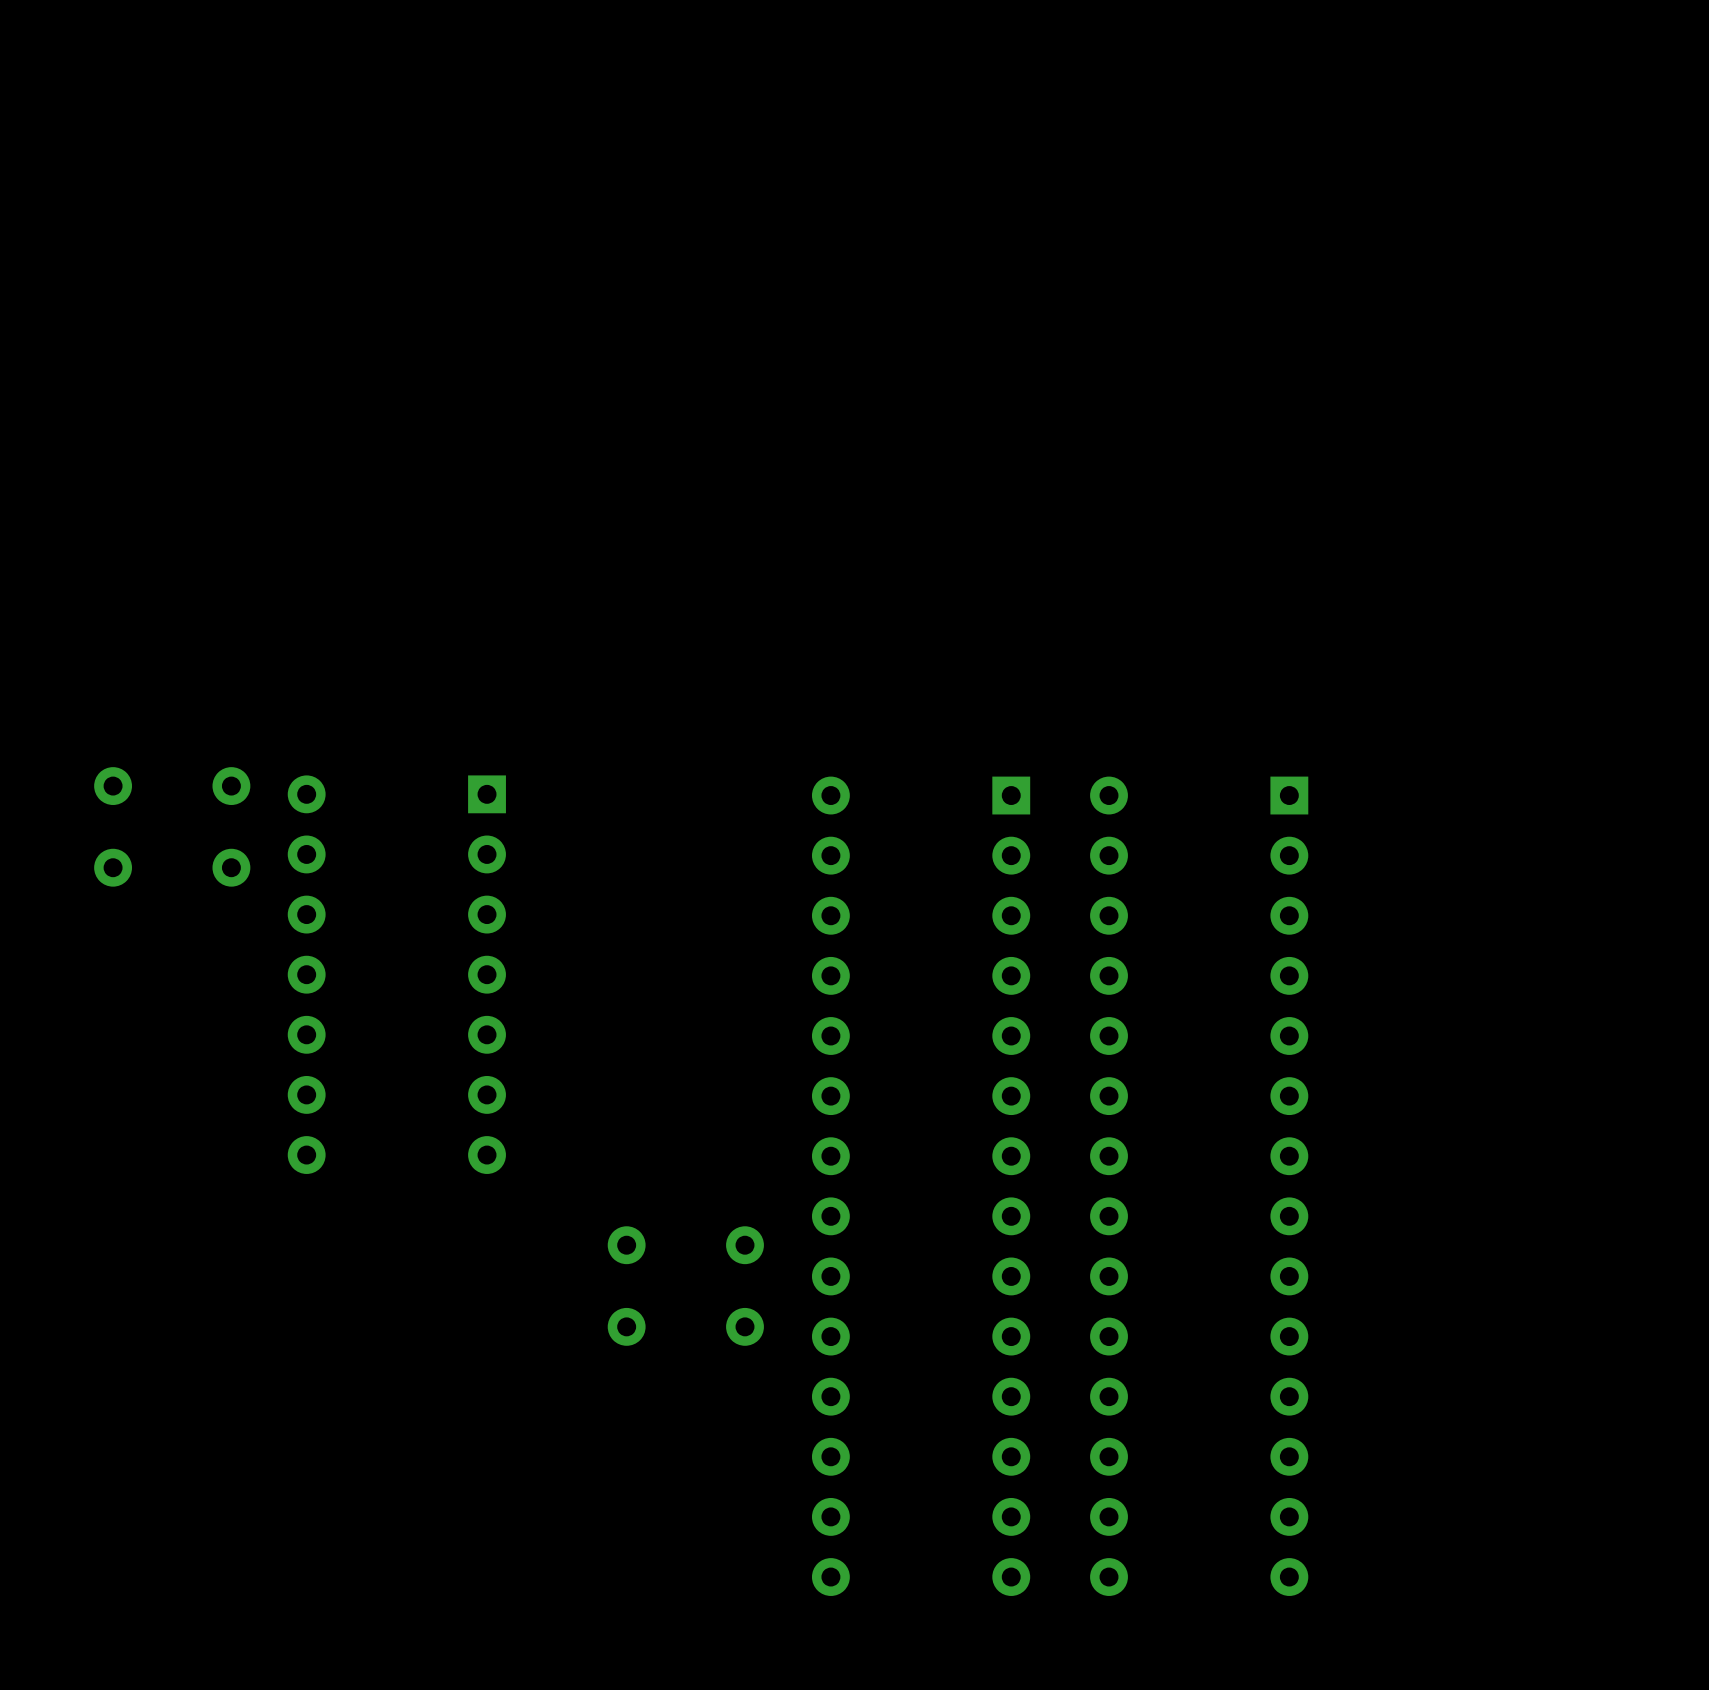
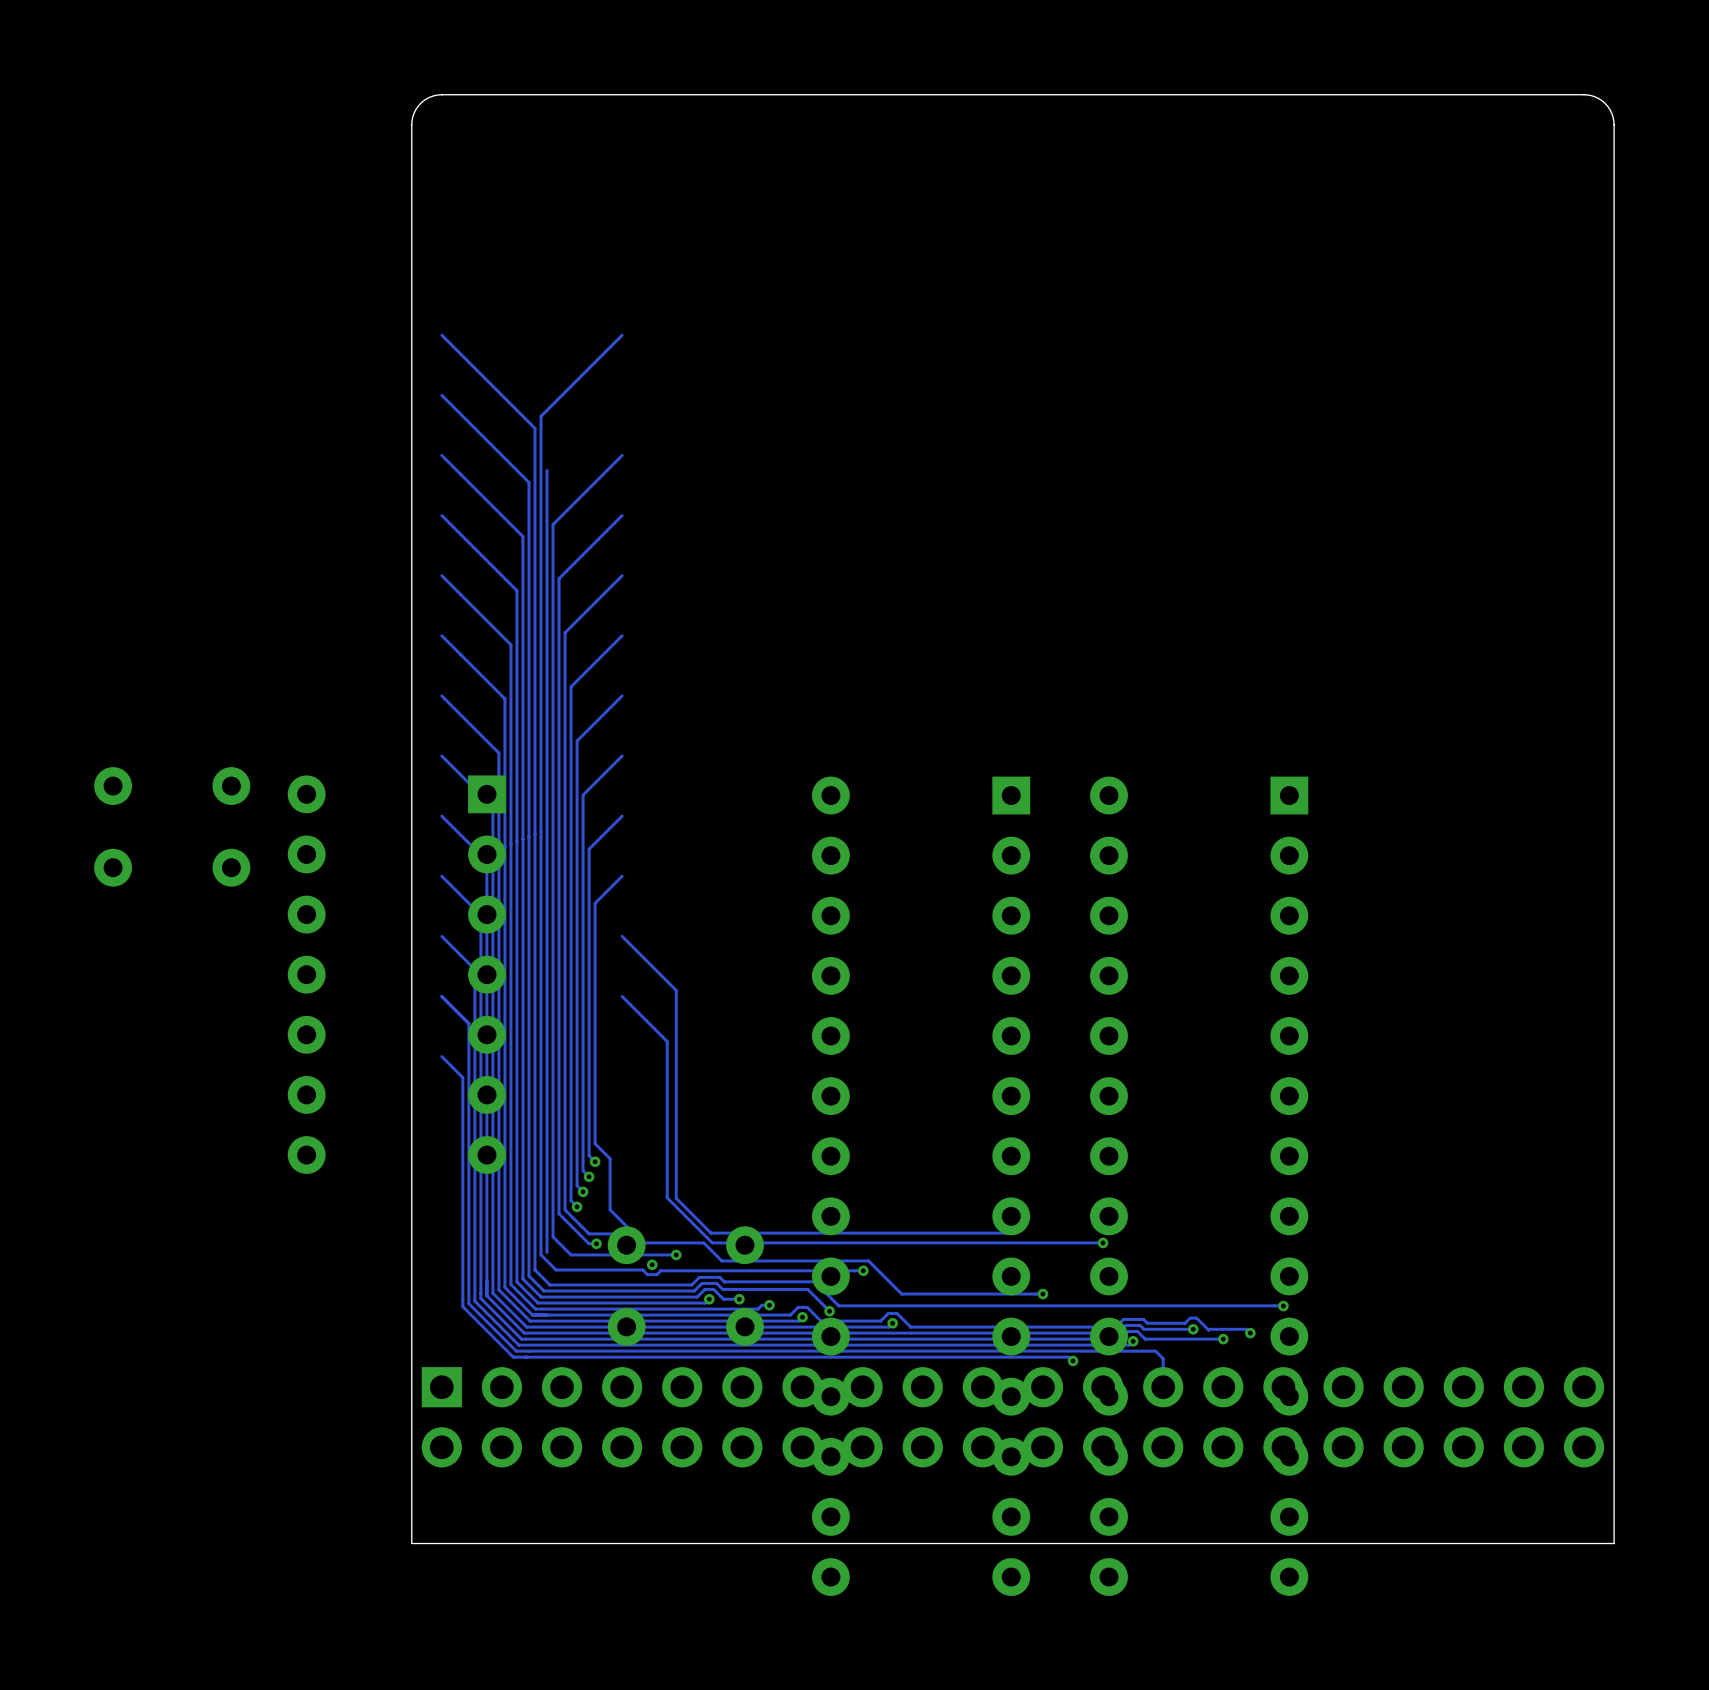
board edge: none -> (1584, 94) (441, 94) (430, 97) (417, 106) (412, 117) (411, 124) (411, 1543) (1614, 1543) (1614, 124) (1611, 113) (1605, 103) (1595, 97) (1584, 94)
track: none -> (441, 335) (534, 428) (535, 1269) (550, 1285) (691, 1285) (699, 1277) (719, 1277) (724, 1282)
track: none -> (622, 335) (541, 416) (541, 1254) (556, 1269) (642, 1269) (647, 1274) (656, 1274) (660, 1270) (863, 1270)
track: none -> (441, 395) (528, 482) (528, 1276) (544, 1291) (694, 1291) (700, 1285)
track: none -> (441, 455) (522, 536) (522, 1279) (541, 1297) (697, 1297) (704, 1289) (713, 1289) (723, 1299) (739, 1299)
track: none -> (622, 455) (553, 524) (553, 1236) (571, 1254) (676, 1254)
track: none -> (547, 470) (547, 1252)
track: none -> (441, 515) (516, 590) (516, 841)
track: none -> (622, 515) (559, 578) (559, 1213) (588, 1243) (596, 1243)
track: none -> (441, 575) (510, 644) (510, 1284) (535, 1309) (758, 1309) (761, 1305) (769, 1305)
track: none -> (622, 575) (565, 632) (565, 1209) (589, 1233) (619, 1233)
track: none -> (441, 635) (504, 698) (504, 1287) (532, 1315) (790, 1315) (798, 1307) (807, 1307) (820, 1321) (880, 1321) (888, 1313) (897, 1313) (910, 1327) (1115, 1327) (1123, 1319) (1143, 1319) (1147, 1323) (1185, 1323) (1190, 1318) (1196, 1318) (1208, 1330) (1246, 1329) (1250, 1333)
track: none -> (622, 635) (571, 686) (571, 1200) (577, 1206)
track: none -> (441, 695) (498, 752) (498, 1289) (530, 1321) (798, 1321) (802, 1317)
track: none -> (622, 695) (577, 740) (577, 1185) (583, 1191)
track: none -> (441, 756) (492, 807) (492, 1293) (526, 1327) (888, 1327) (892, 1323)
track: none -> (622, 756) (583, 795) (583, 1170) (589, 1176)
track: none -> (441, 816) (486, 861) (486, 1296)
track: none -> (622, 816) (589, 849) (589, 1155) (595, 1161)
track: none -> (516, 841) (516, 1282) (538, 1303) (705, 1303) (709, 1299)
track: none -> (441, 876) (480, 915) (480, 1298) (521, 1339) (1121, 1339)
track: none -> (622, 876) (595, 903) (595, 1143) (610, 1158) (610, 1209) (643, 1242) (703, 1242) (721, 1260) (868, 1260) (901, 1294) (1042, 1294)
track: none -> (441, 936) (474, 969) (474, 1301) (518, 1345) (1129, 1345) (1133, 1341)
track: none -> (622, 936) (676, 990) (676, 1198) (711, 1233) (1012, 1233)
track: none -> (441, 996) (468, 1023) (468, 1303) (516, 1351) (1155, 1351) (1163, 1358) (1163, 1387)
track: none -> (622, 996) (667, 1041) (667, 1197) (712, 1242) (1103, 1242)
track: none -> (441, 1056) (462, 1077) (462, 1306) (513, 1357) (1069, 1357) (1073, 1360)
via: none -> (595, 1161)
via: none -> (589, 1176)
via: none -> (583, 1191)
via: none -> (577, 1206)
via: none -> (1103, 1242)
via: none -> (596, 1243)
via: none -> (676, 1254)
via: none -> (652, 1264)
via: none -> (863, 1270)
track: none -> (724, 1281) (814, 1281) (838, 1305) (1283, 1305)
track: none -> (700, 1285) (716, 1283) (722, 1289) (807, 1289) (829, 1311)
via: none -> (1042, 1294)
track: none -> (486, 1295) (524, 1333) (1118, 1333) (1121, 1330)
via: none -> (709, 1299)
via: none -> (739, 1299)
via: none -> (769, 1305)
via: none -> (1283, 1306)
via: none -> (829, 1311)
via: none -> (802, 1317)
via: none -> (892, 1323)
track: none -> (1193, 1329) (1143, 1329) (1140, 1325) (1125, 1325) (1121, 1330)
via: none -> (1193, 1329)
via: none -> (1250, 1333)
track: none -> (1121, 1338) (1128, 1331) (1137, 1331) (1145, 1339) (1223, 1339)
via: none -> (1223, 1339)
via: none -> (1133, 1341)
via: none -> (1073, 1360)
part: none -> (1012, 1417)

